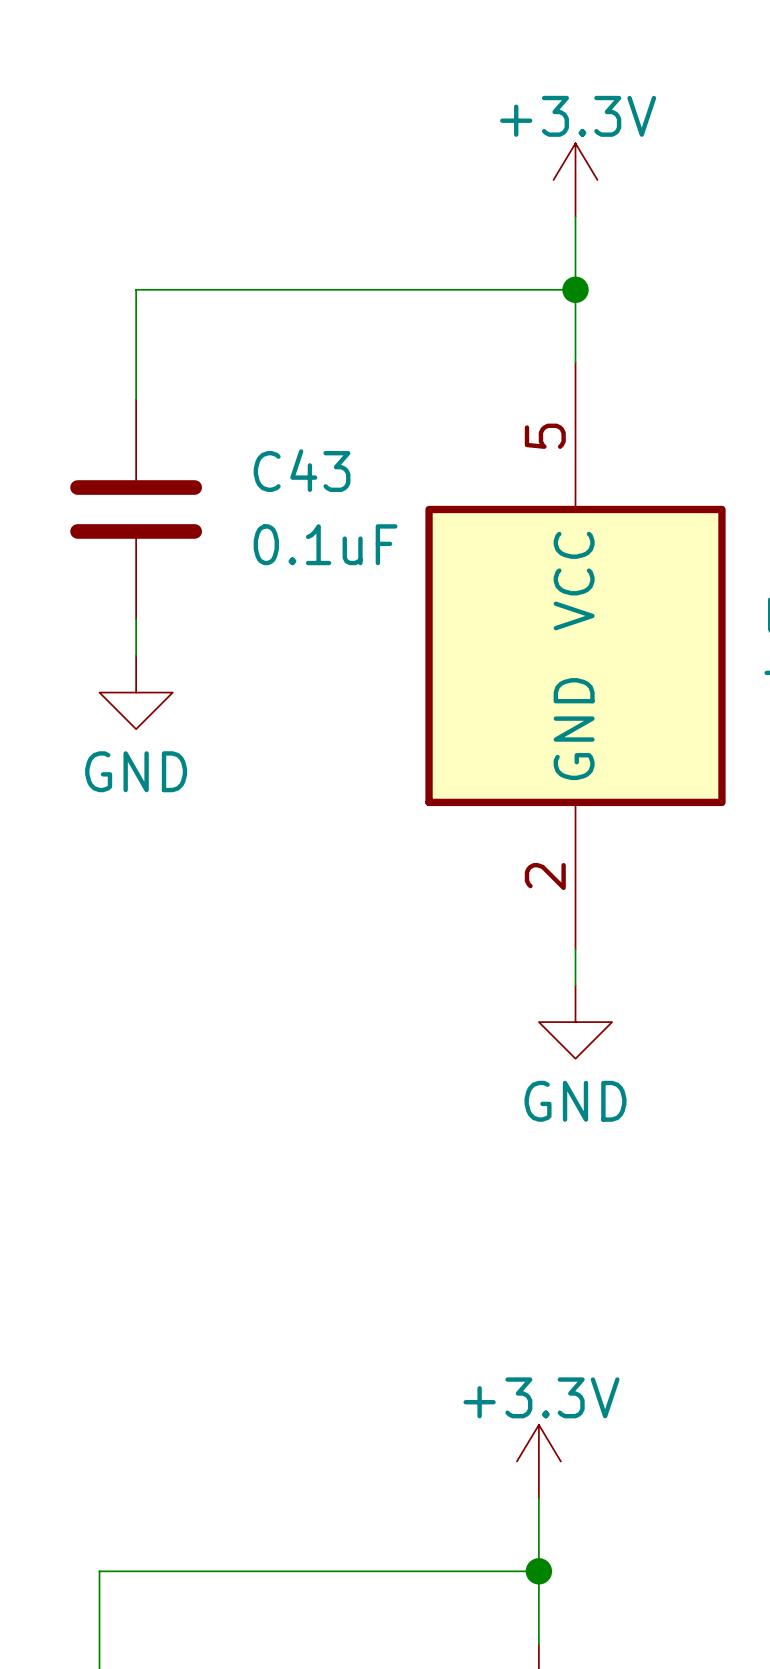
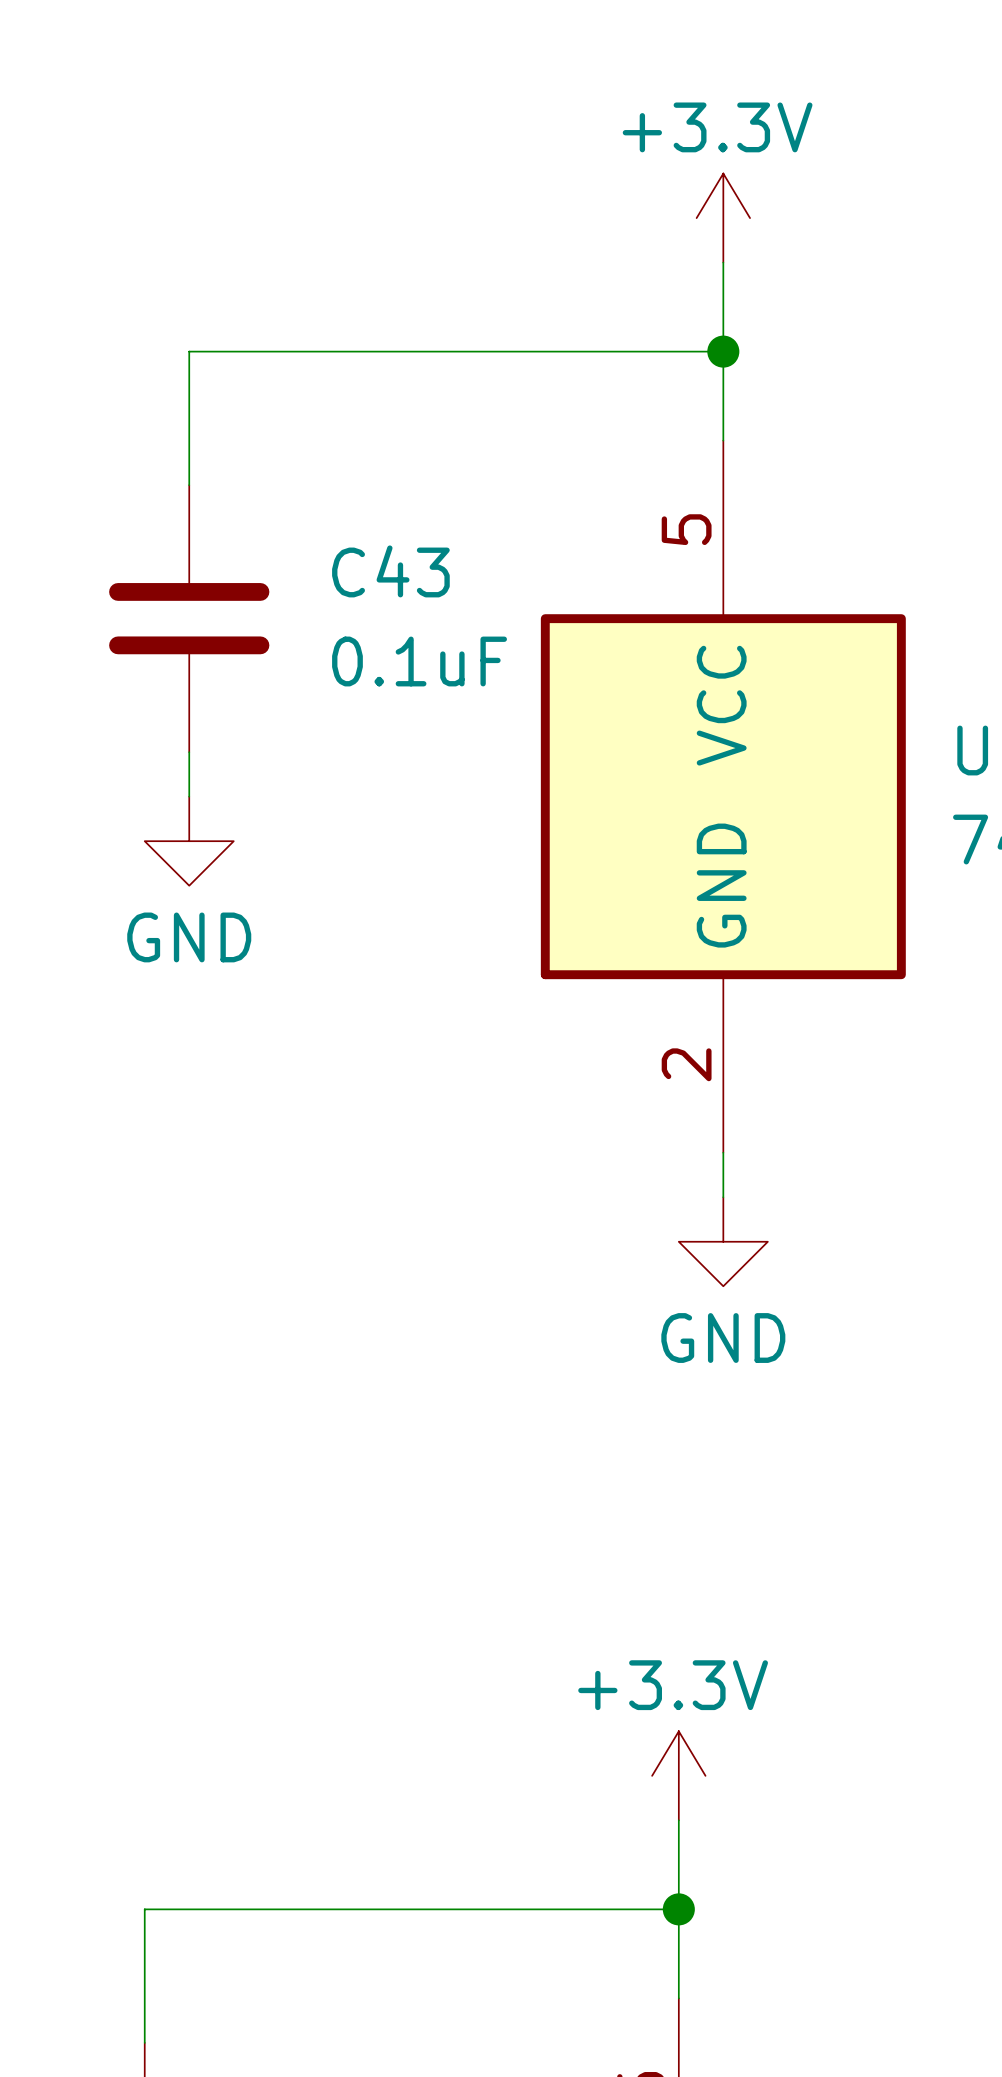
power symbol text position: +3.3V (578, 116) -> +3.3V (717, 127)
power symbol text position: +3.3V (541, 1397) -> +3.3V (673, 1685)

